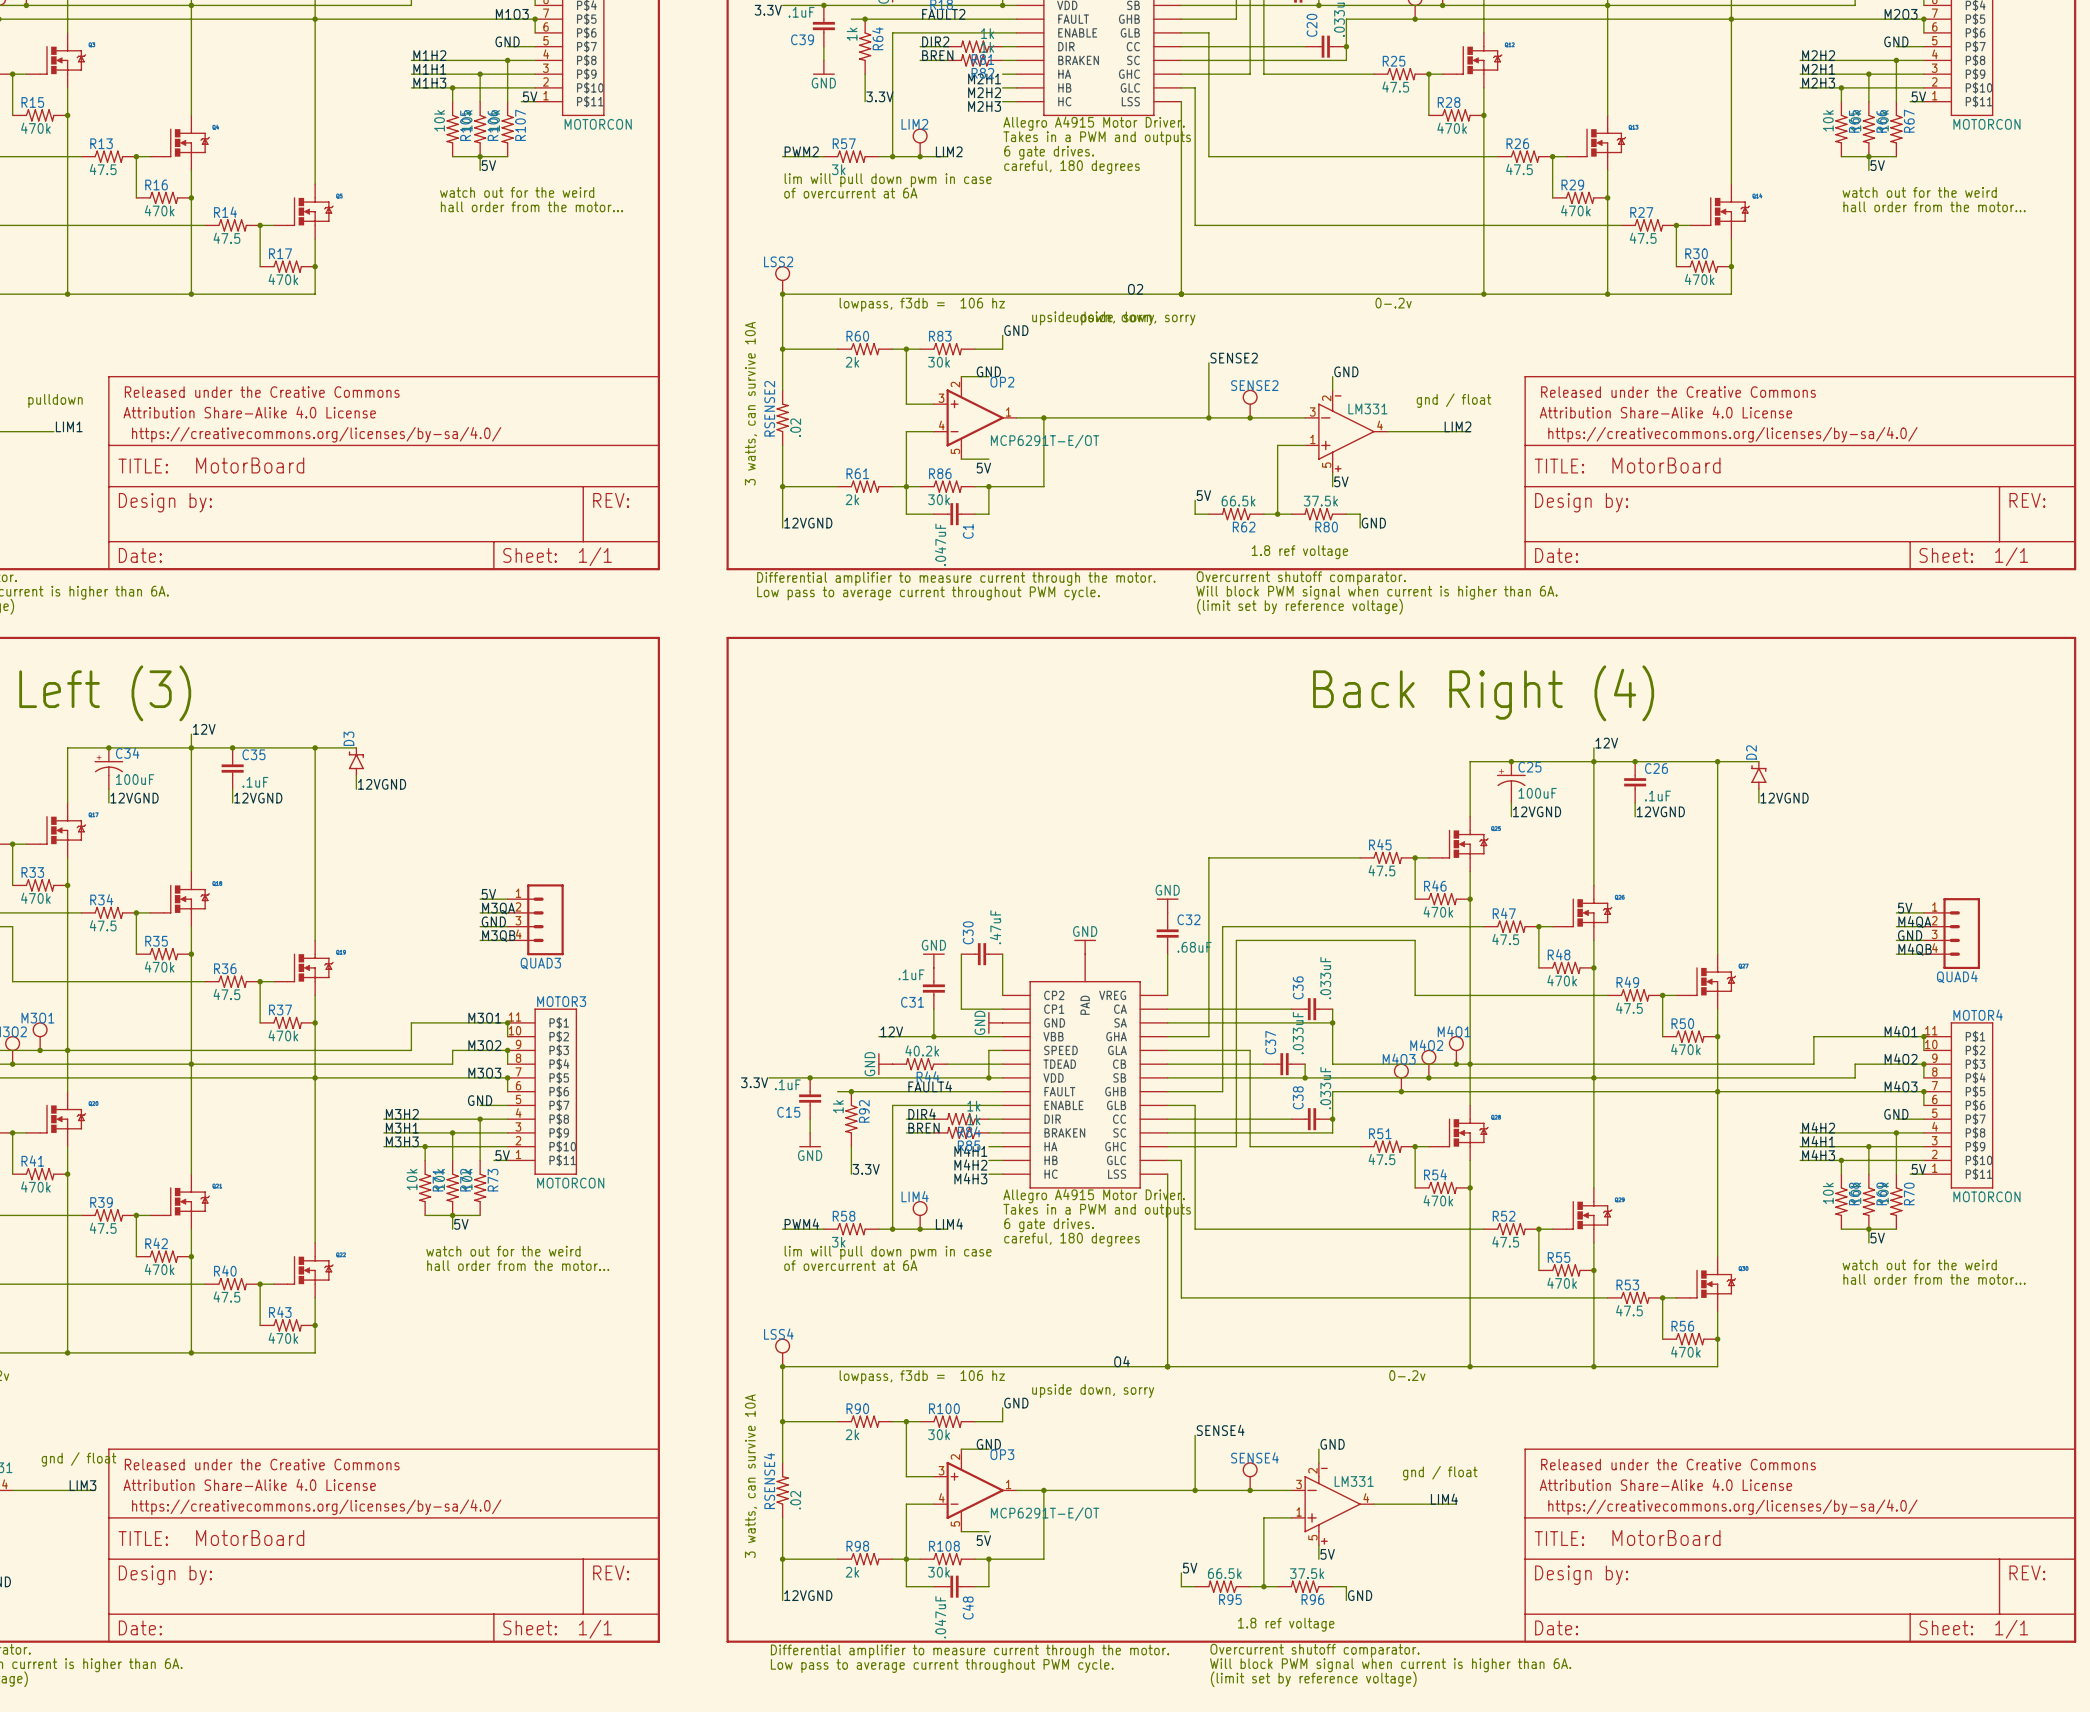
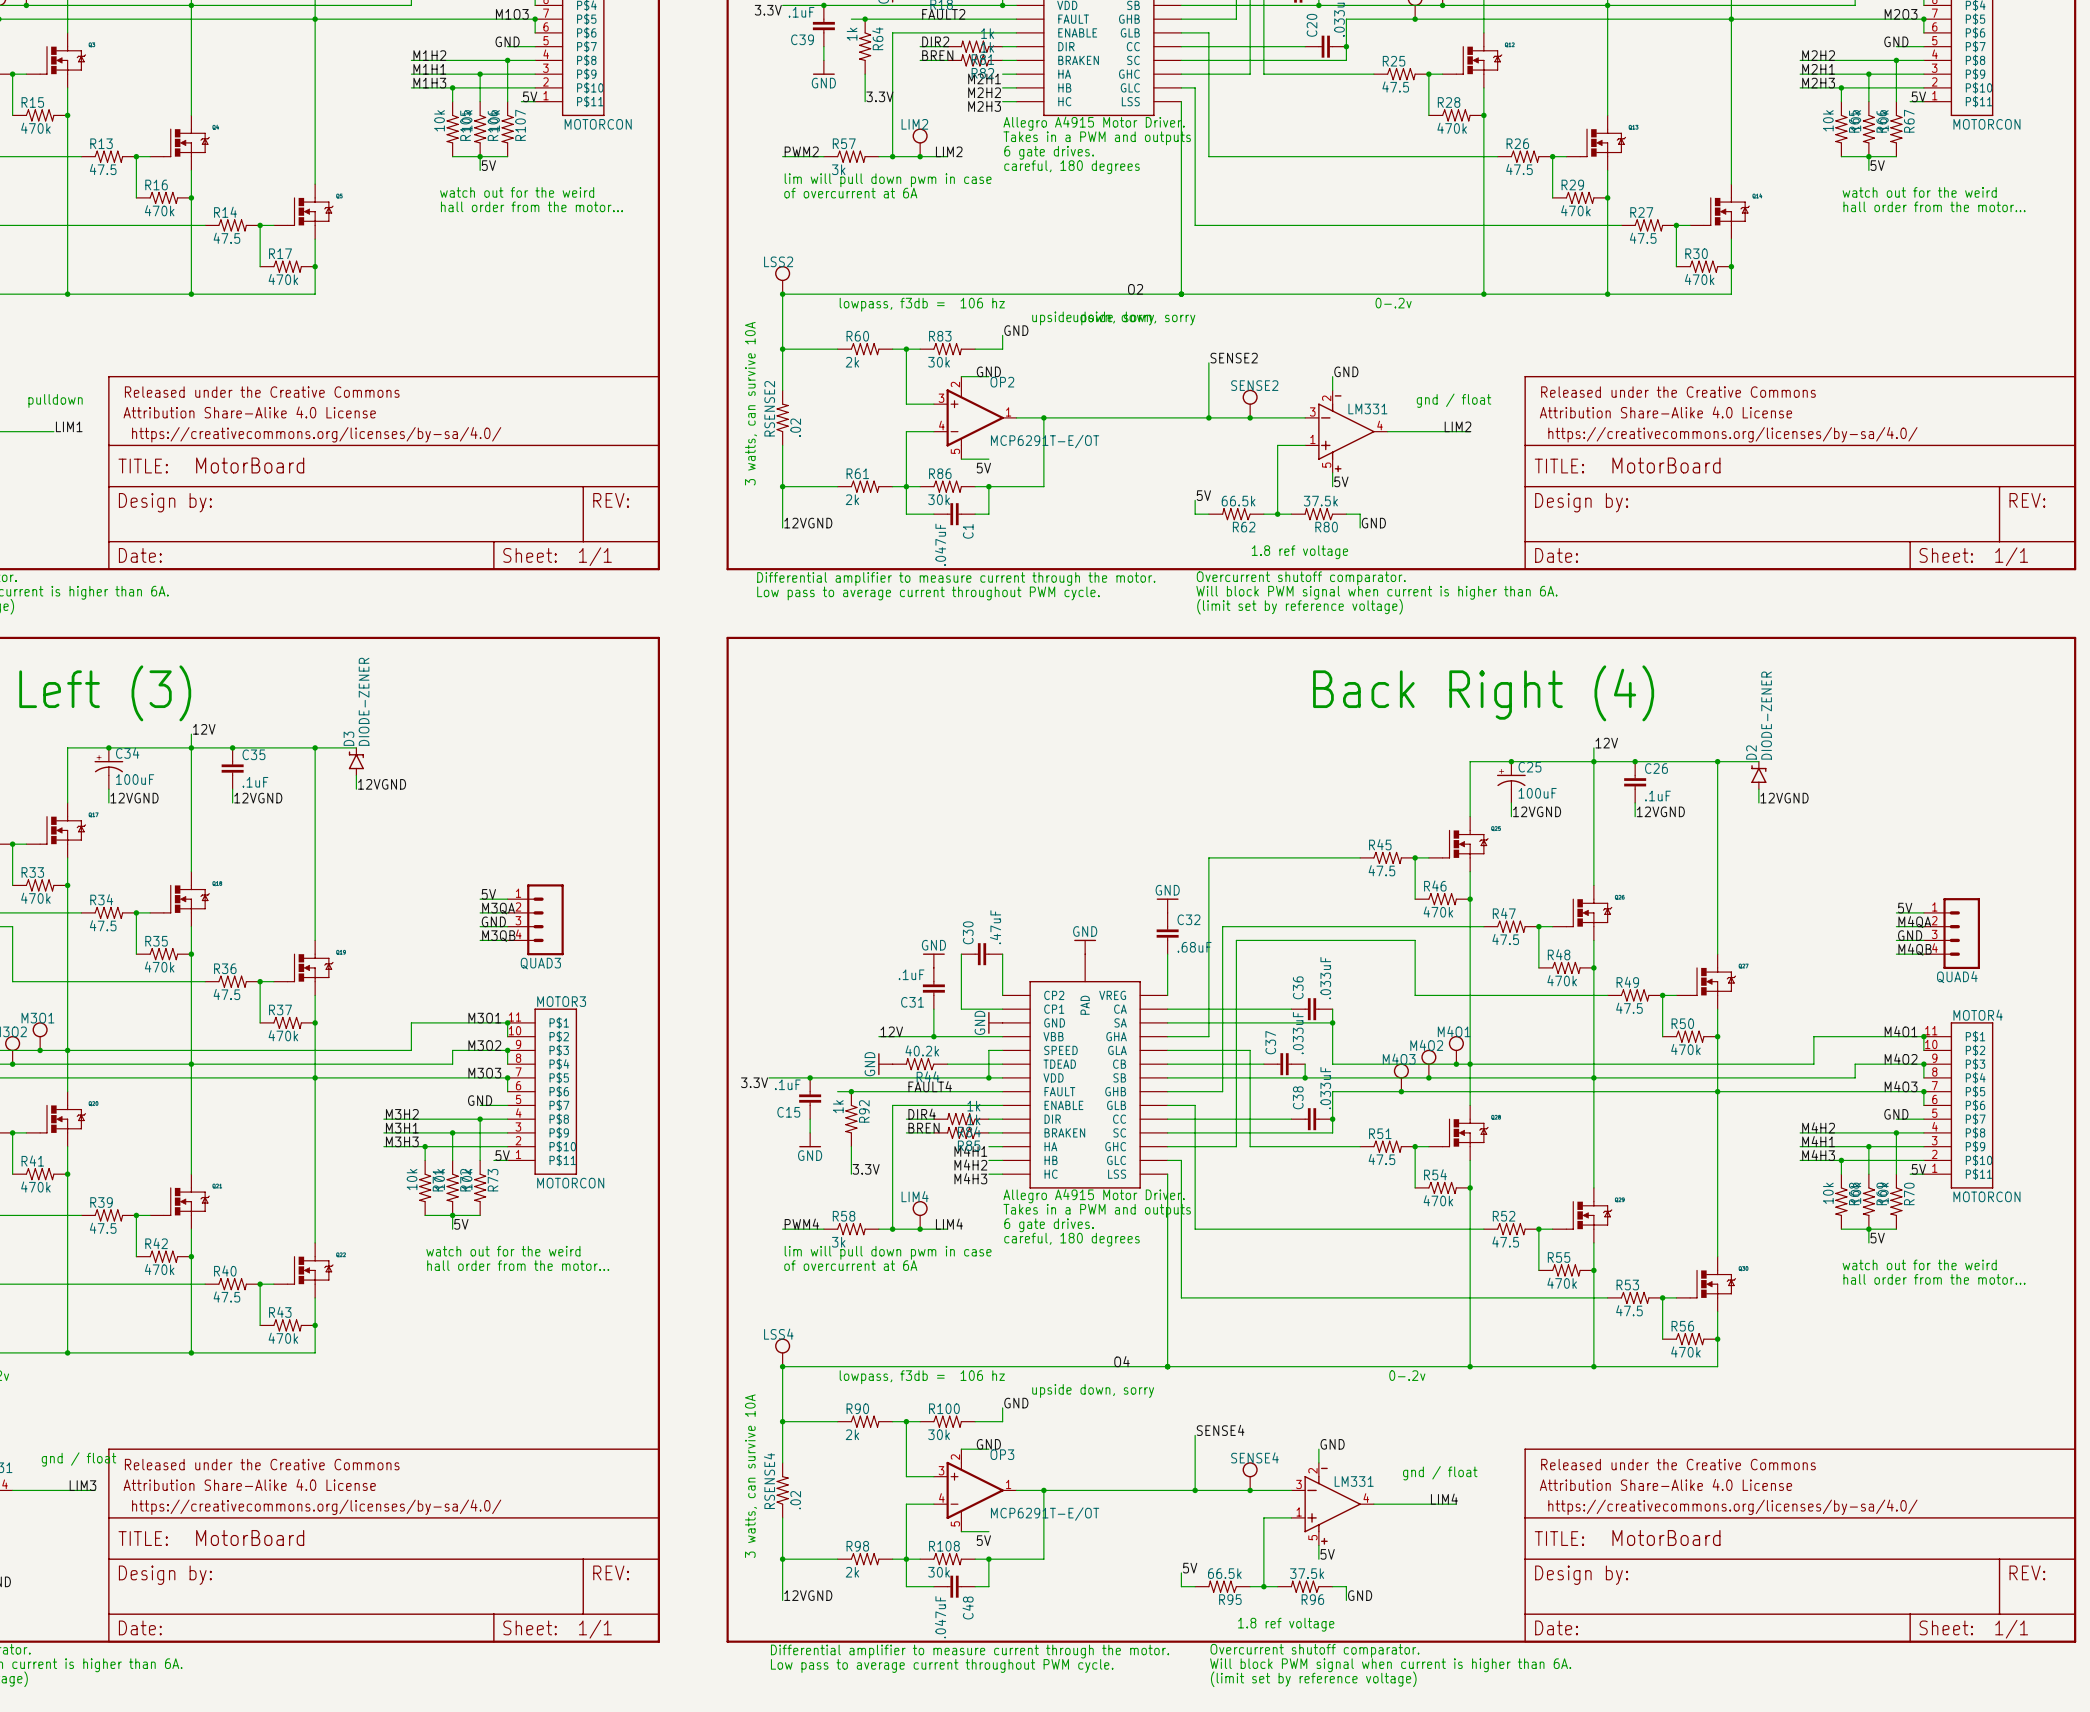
D3 value: none -> DIODE-ZENER (364, 701)
D2 value: none -> DIODE-ZENER (1766, 715)

